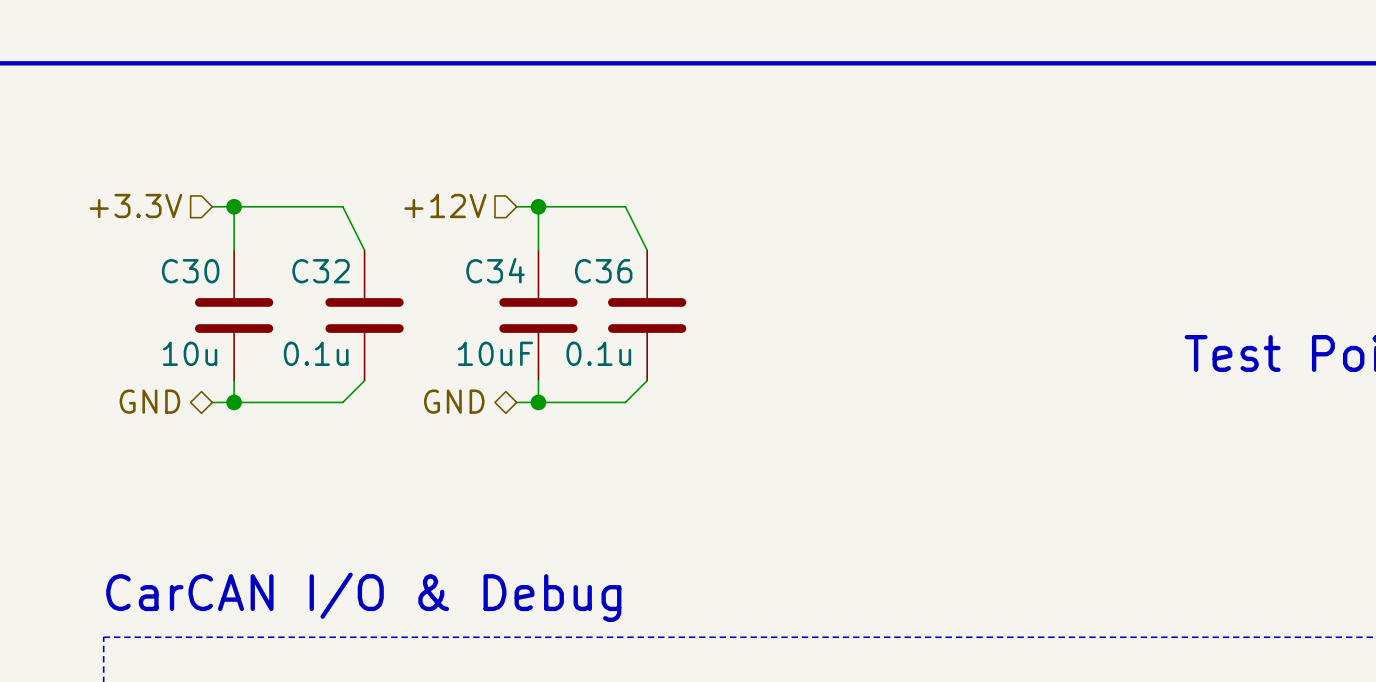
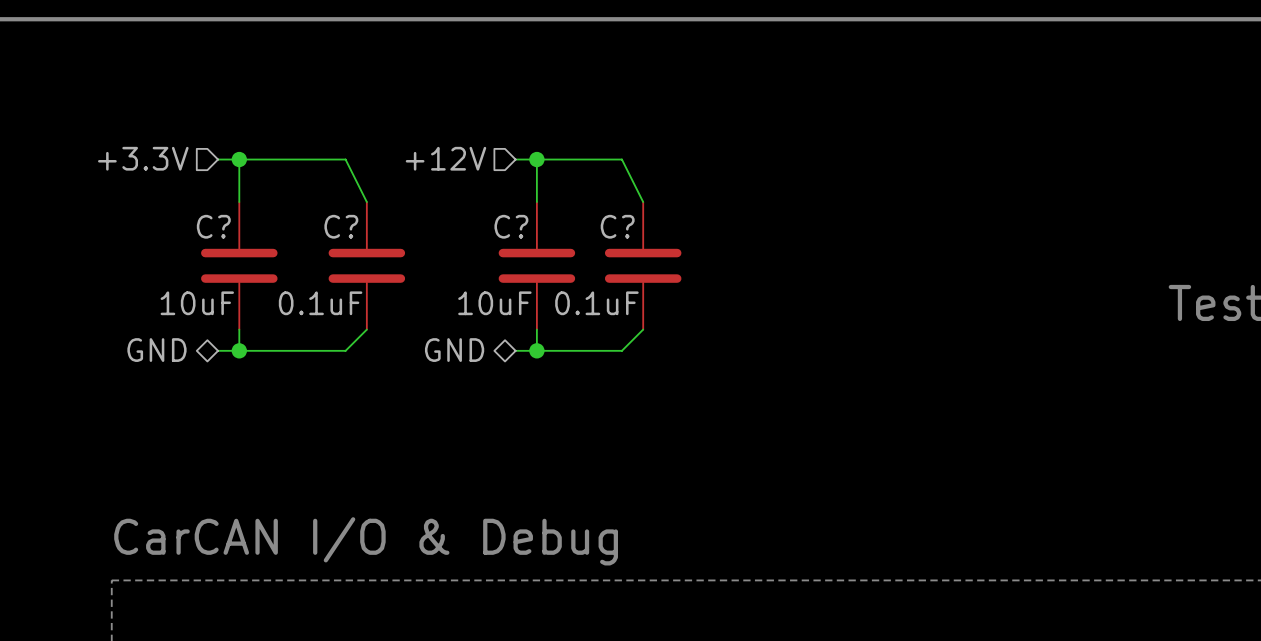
C34 name: C34 (495, 270) -> C? (511, 226)
C30 name: C30 (190, 271) -> C? (213, 226)
C32 name: C32 (321, 271) -> C? (341, 226)
C36 name: C36 (603, 271) -> C? (617, 226)
C30 value: 10u (190, 353) -> 10uF (197, 303)
C32 value: 0.1u (316, 353) -> 0.1uF (320, 303)
C36 value: 0.1u (598, 353) -> 0.1uF (596, 303)

